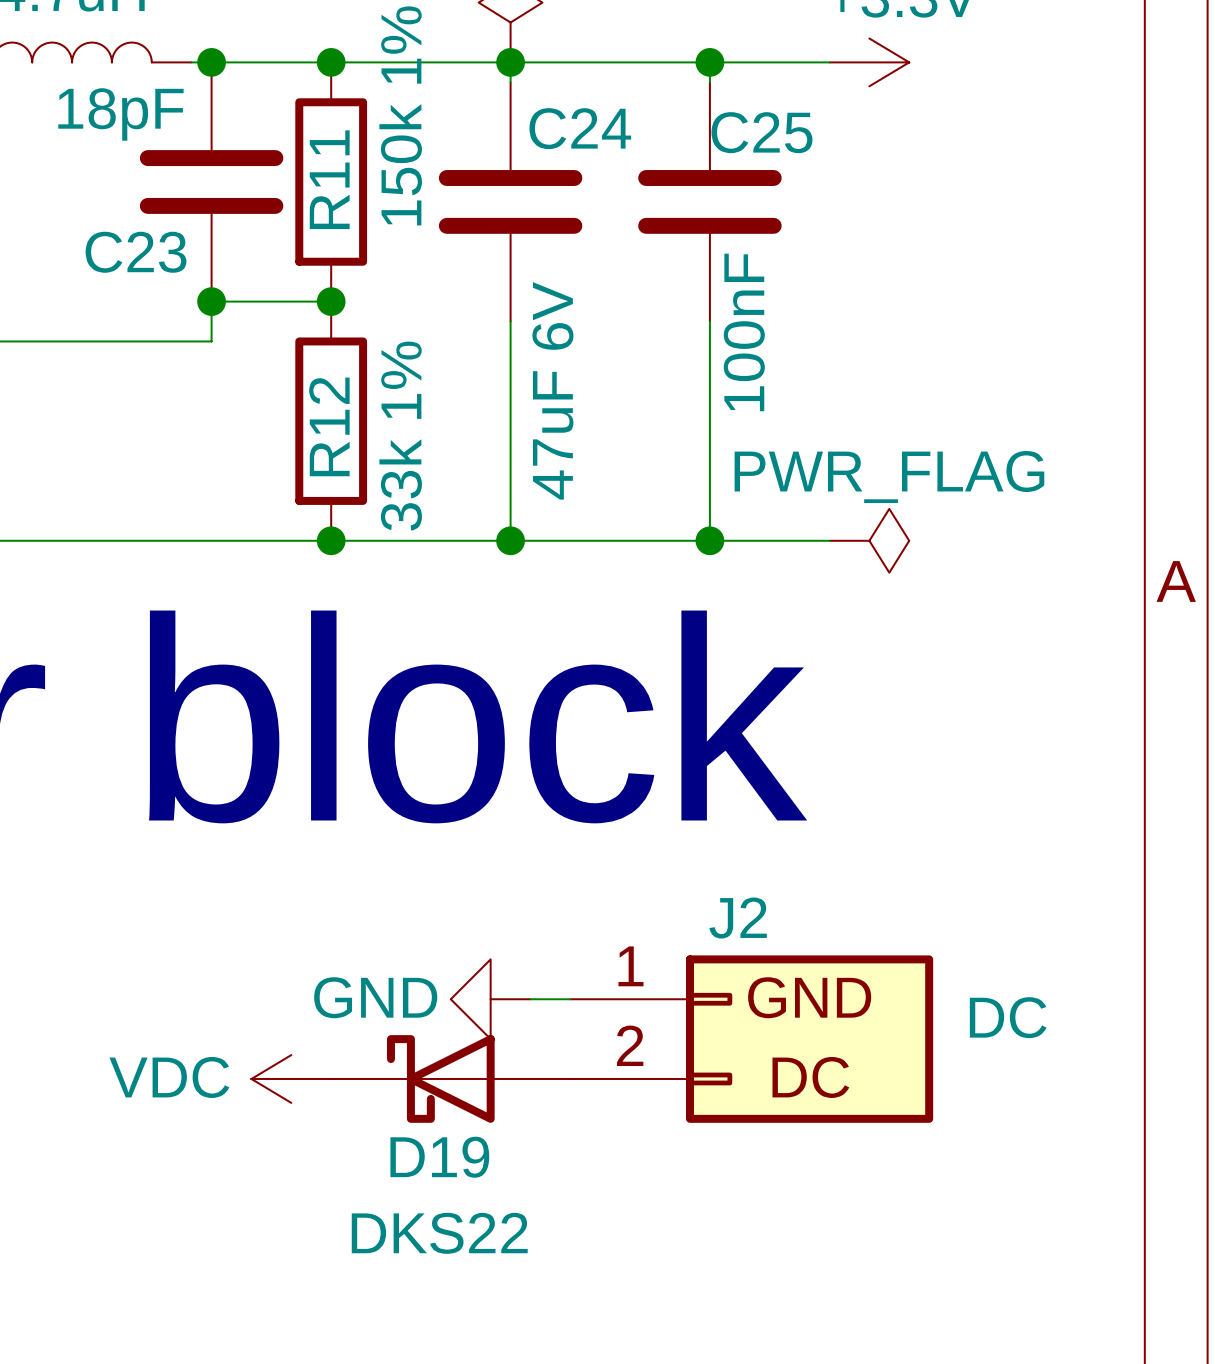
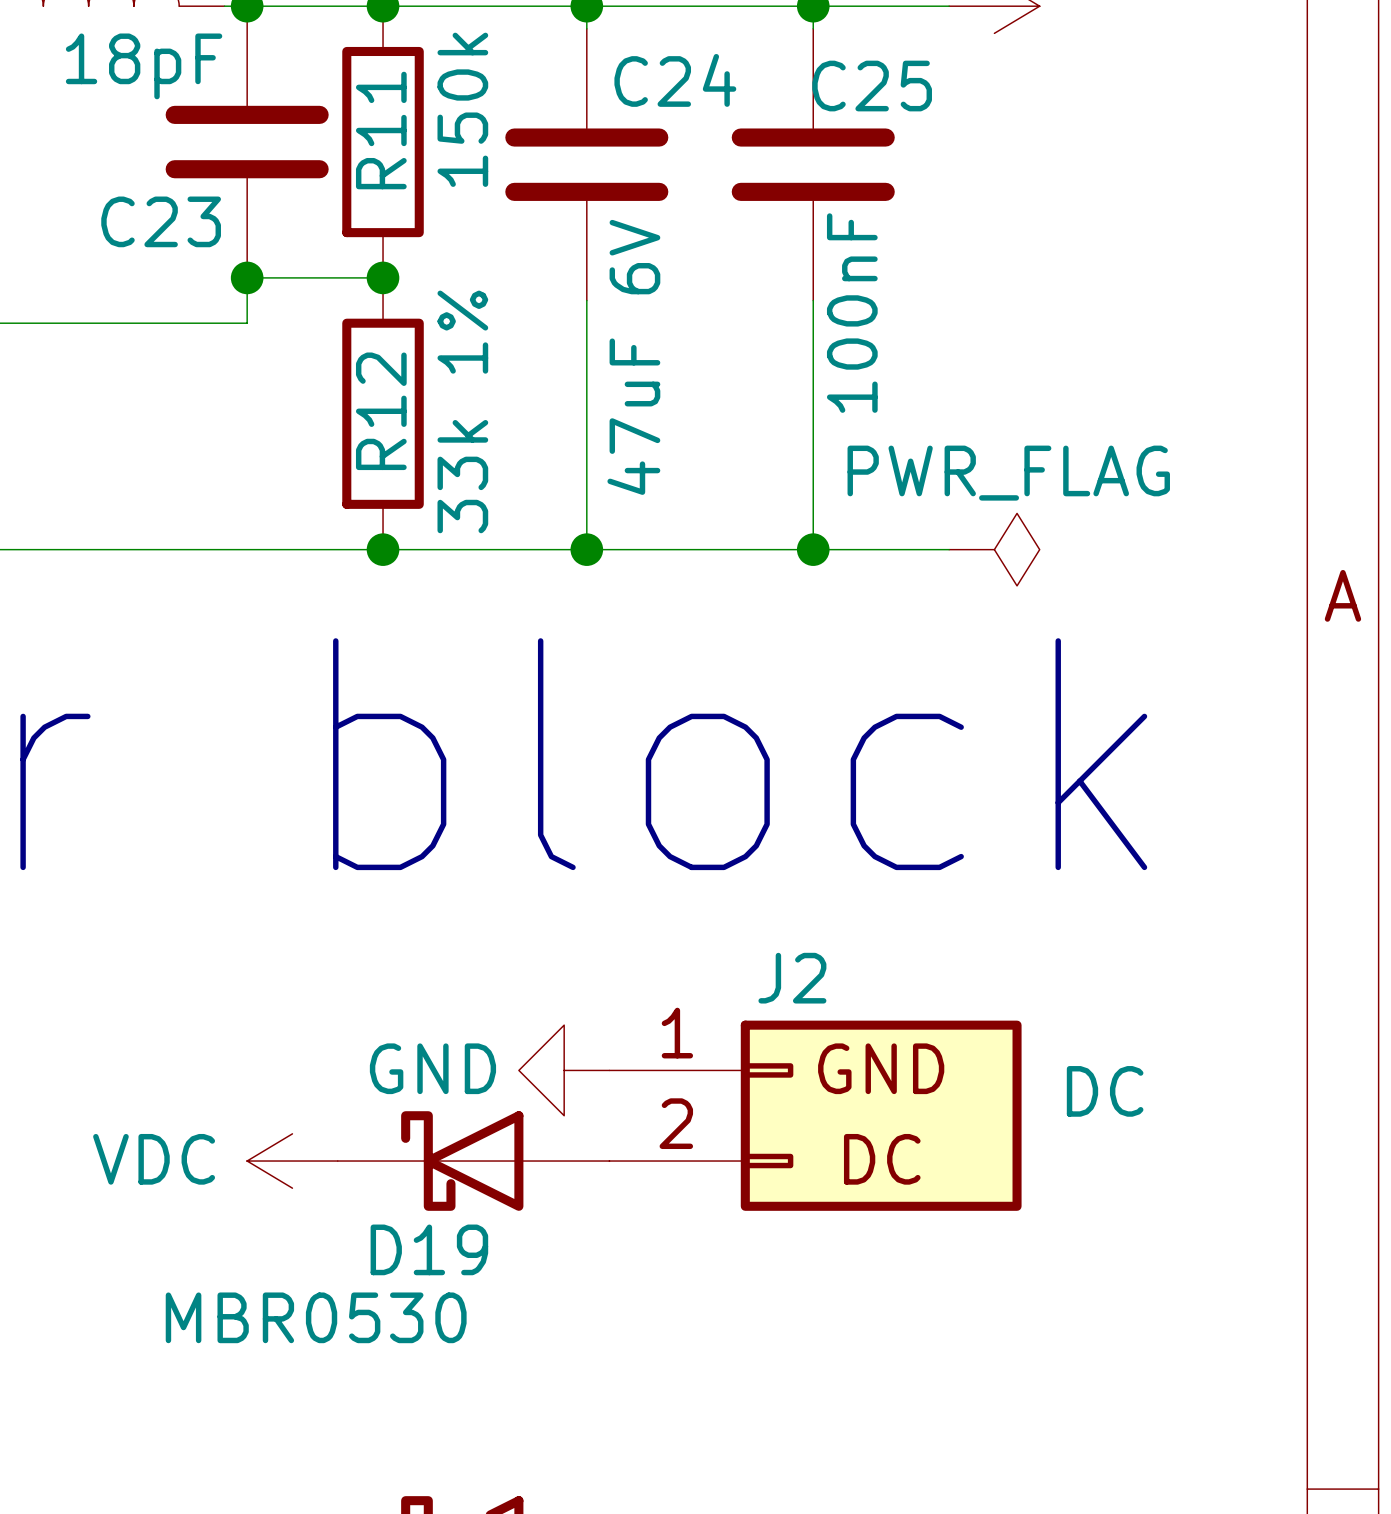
J2 position: (751, 1039) -> (815, 1115)
power symbol position: VDC (291, 1078) -> VDC (292, 1161)
D19 position: (450, 1078) -> (473, 1161)
D19 name position: D19 (439, 1157) -> D19 (429, 1249)
D19 value: DKS22 (439, 1233) -> MBR0530 (316, 1317)

